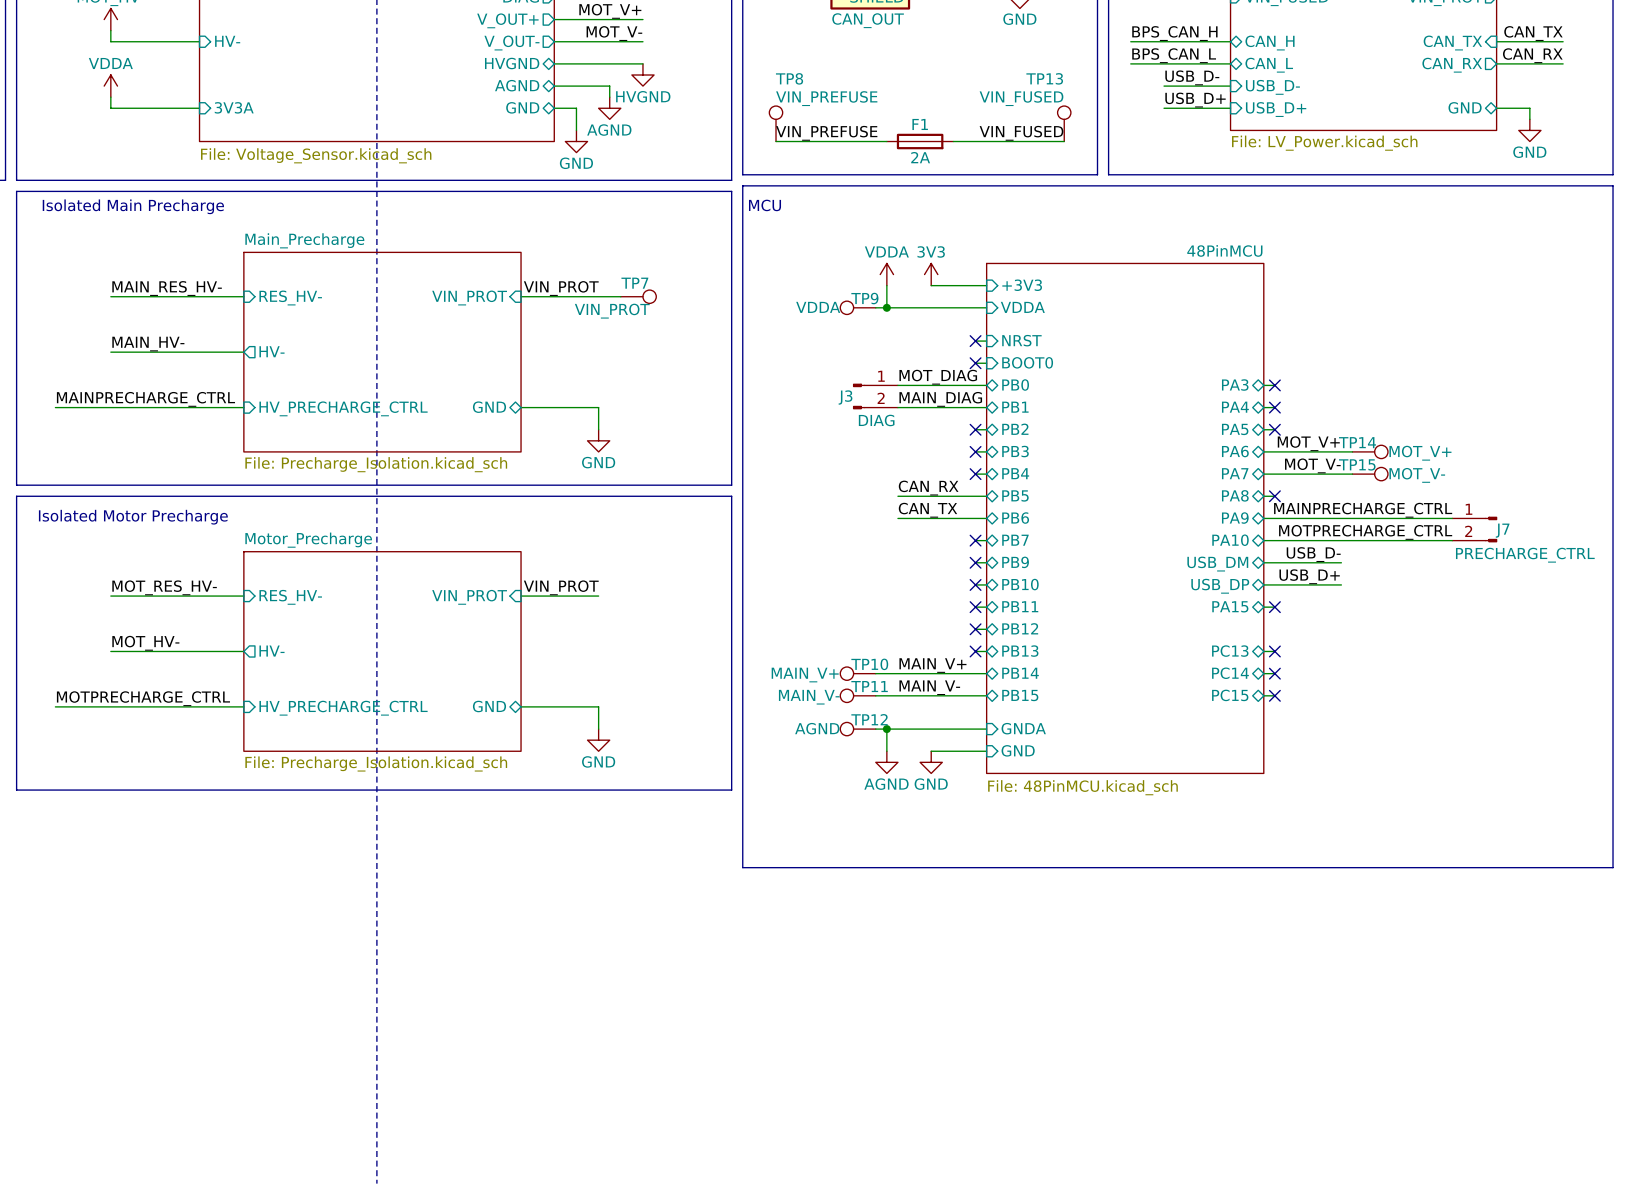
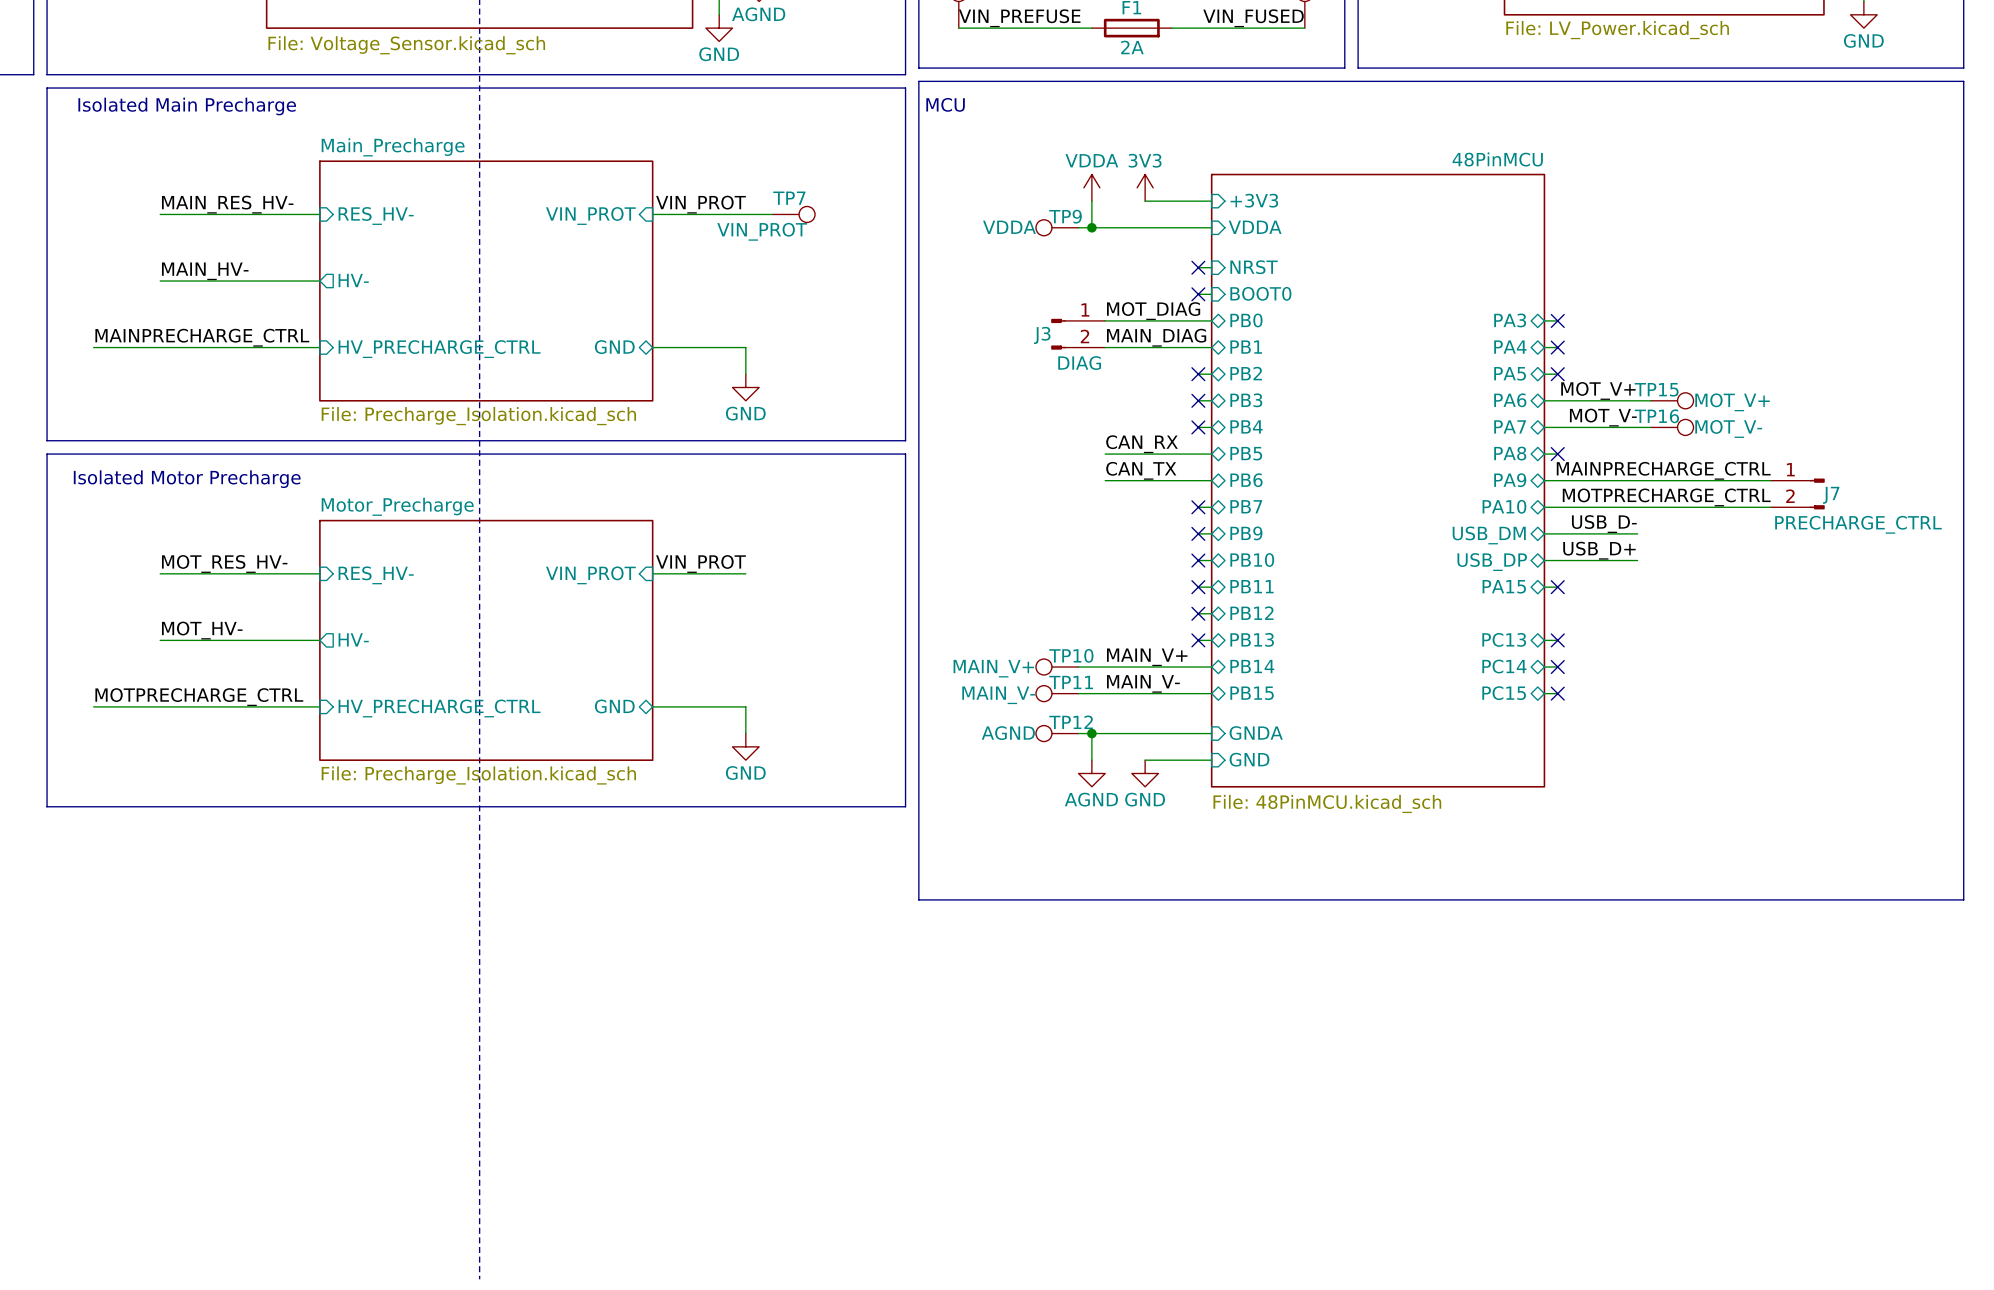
TP14 name: TP14 (1357, 442) -> TP15 (1656, 389)
TP15 name: TP15 (1357, 464) -> TP16 (1656, 416)

